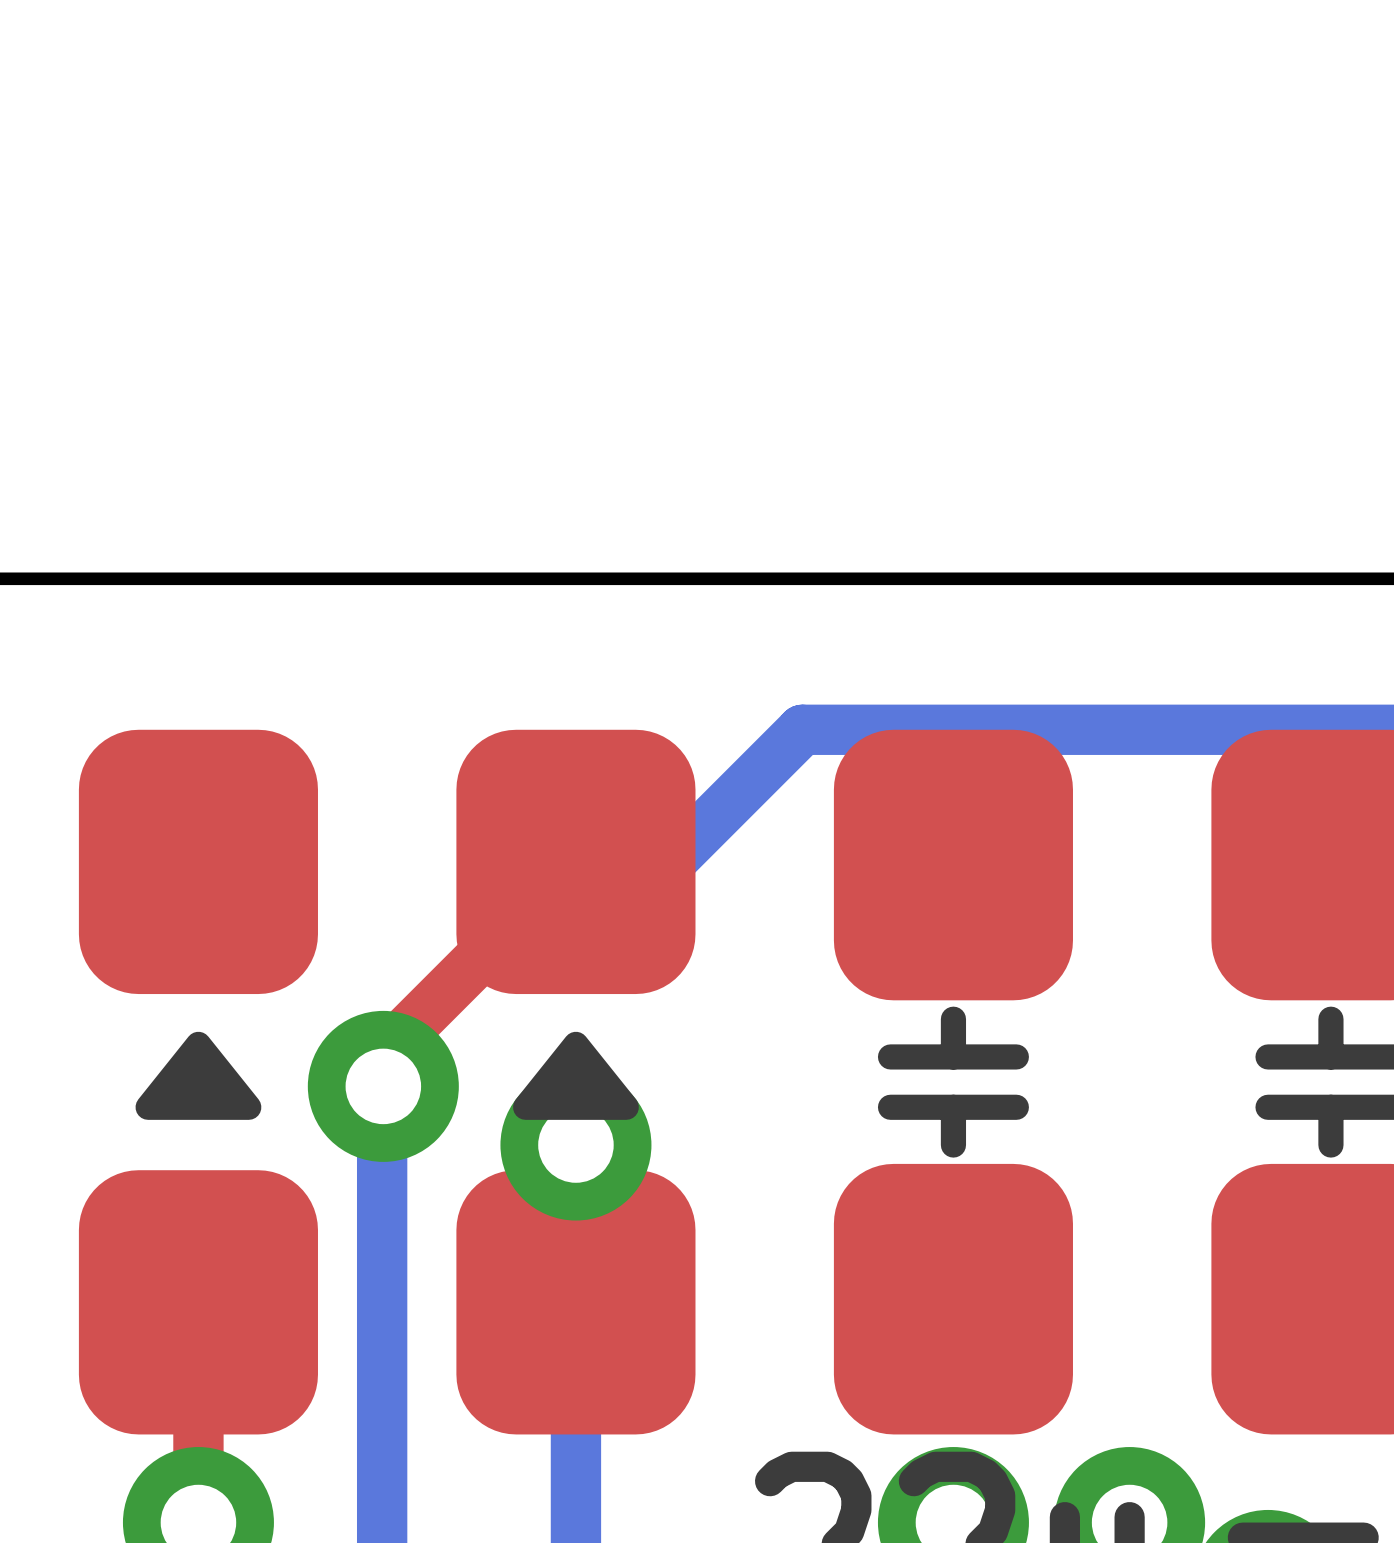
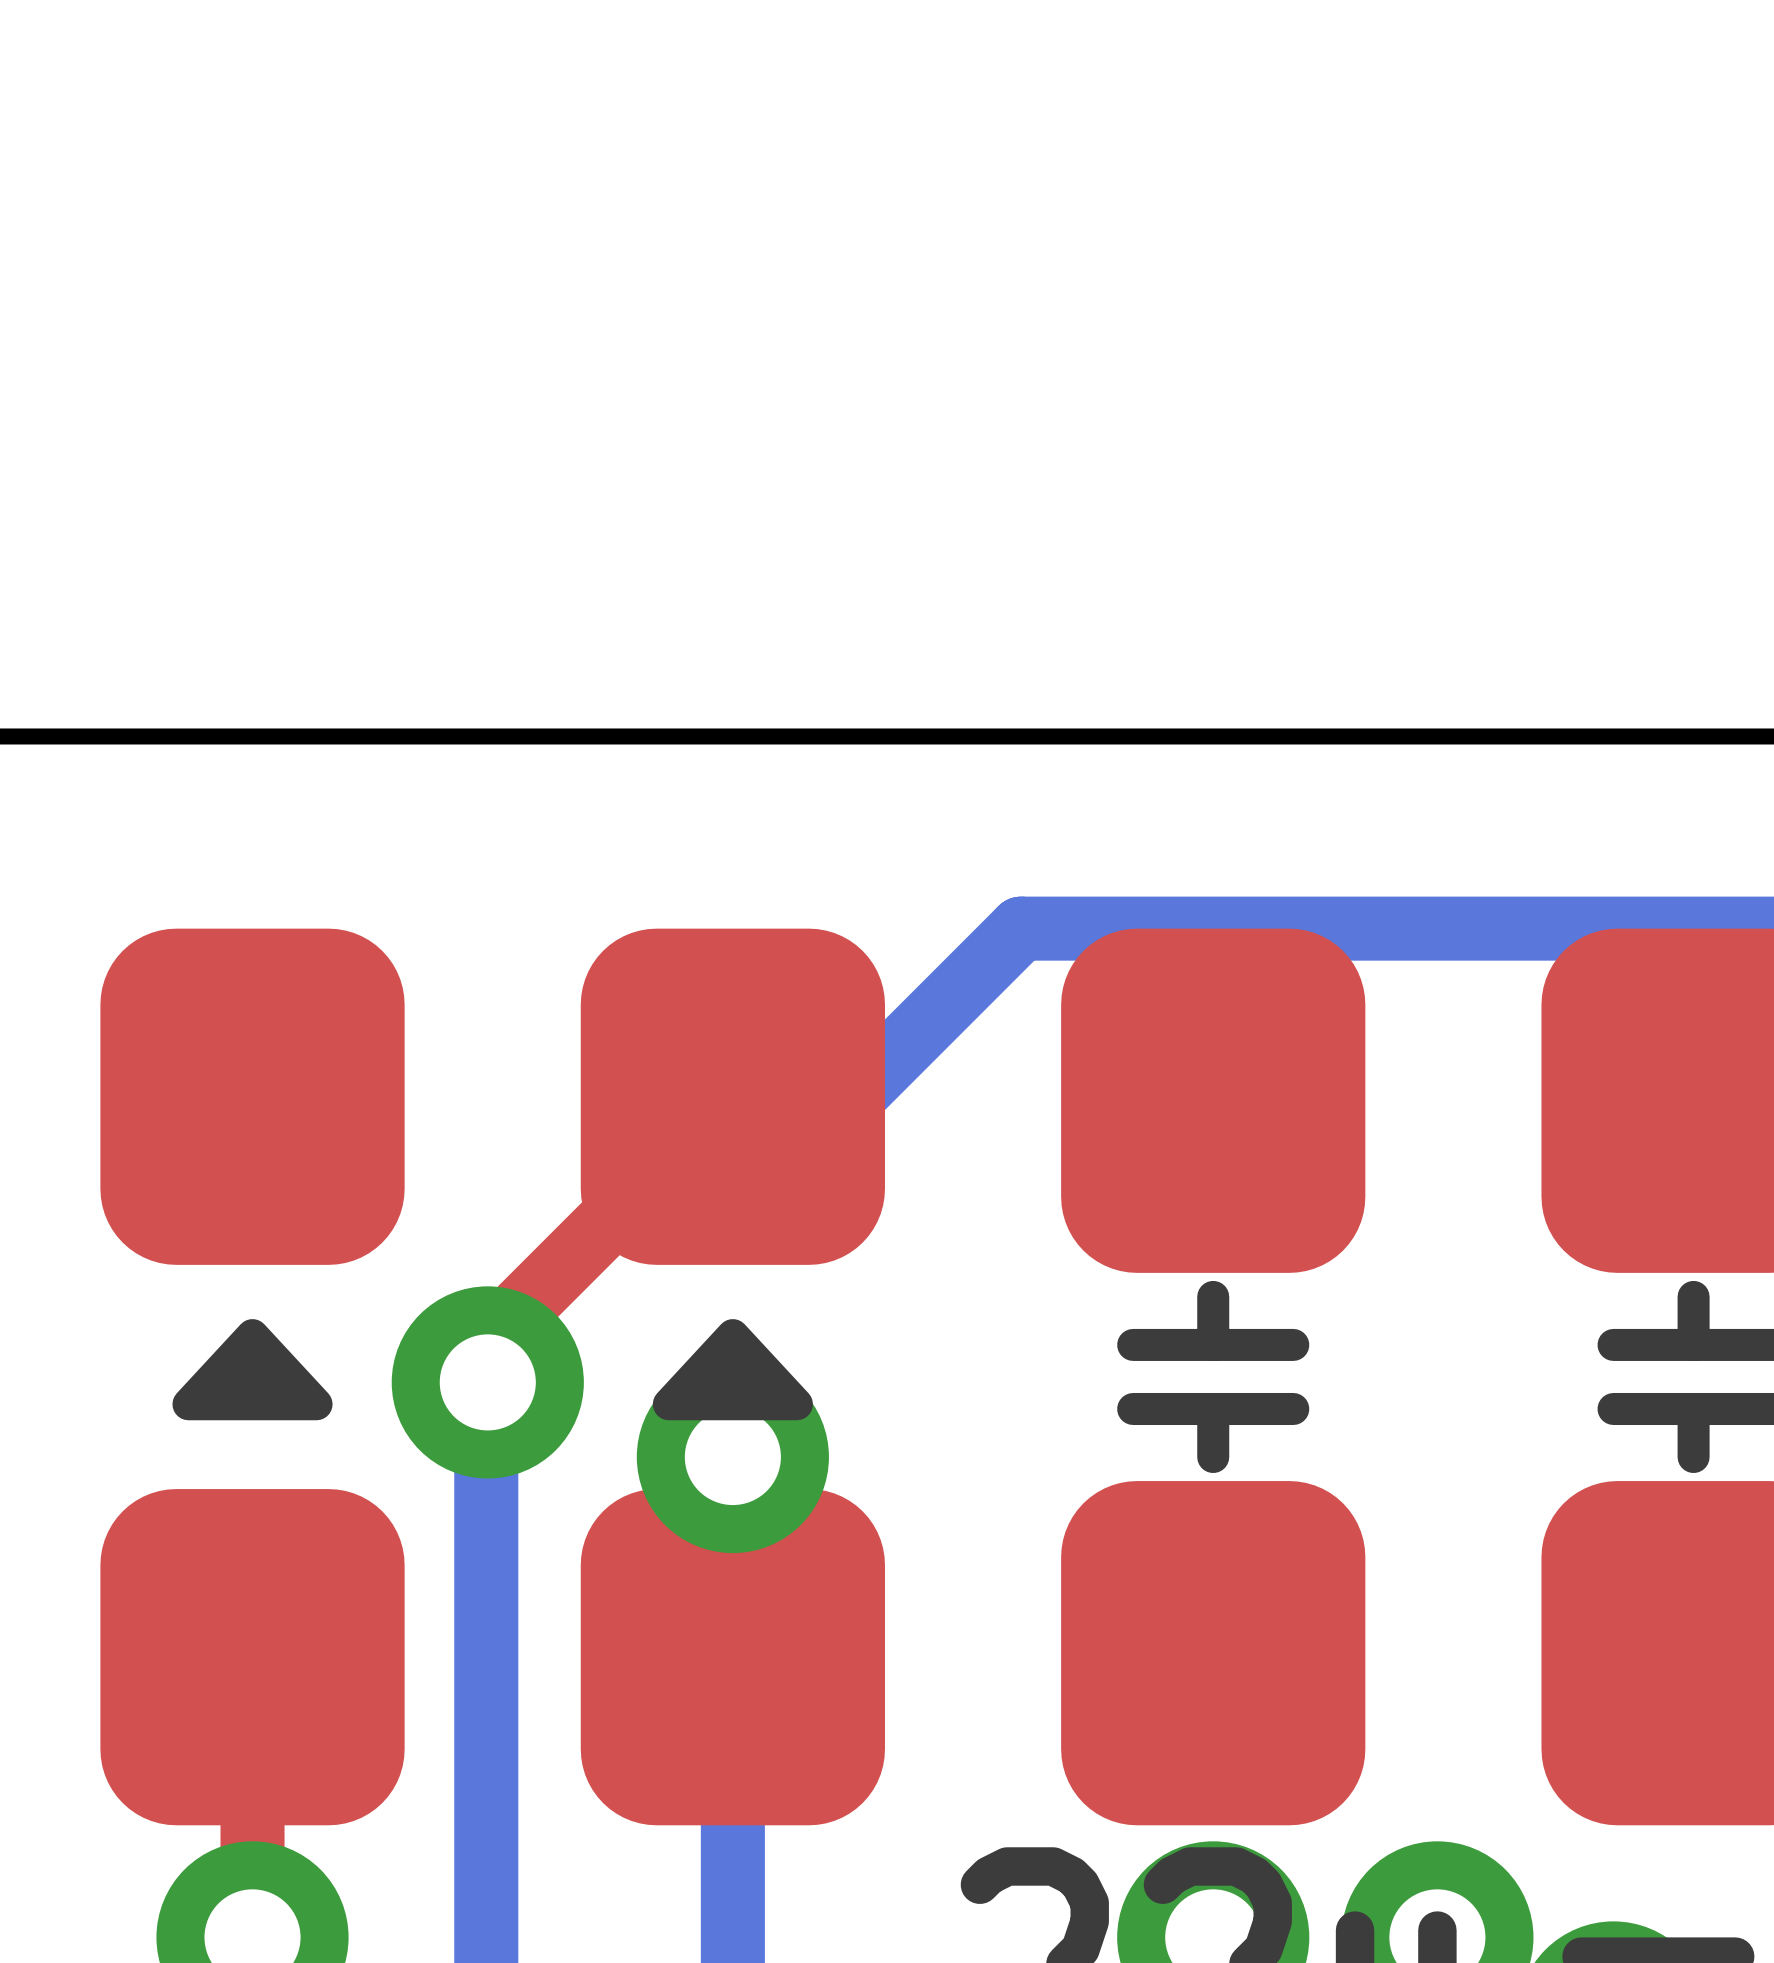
part footprint: [78, 729, 318, 1435] -> [100, 928, 405, 1826]
part footprint: [456, 729, 696, 1435] -> [580, 928, 885, 1826]

